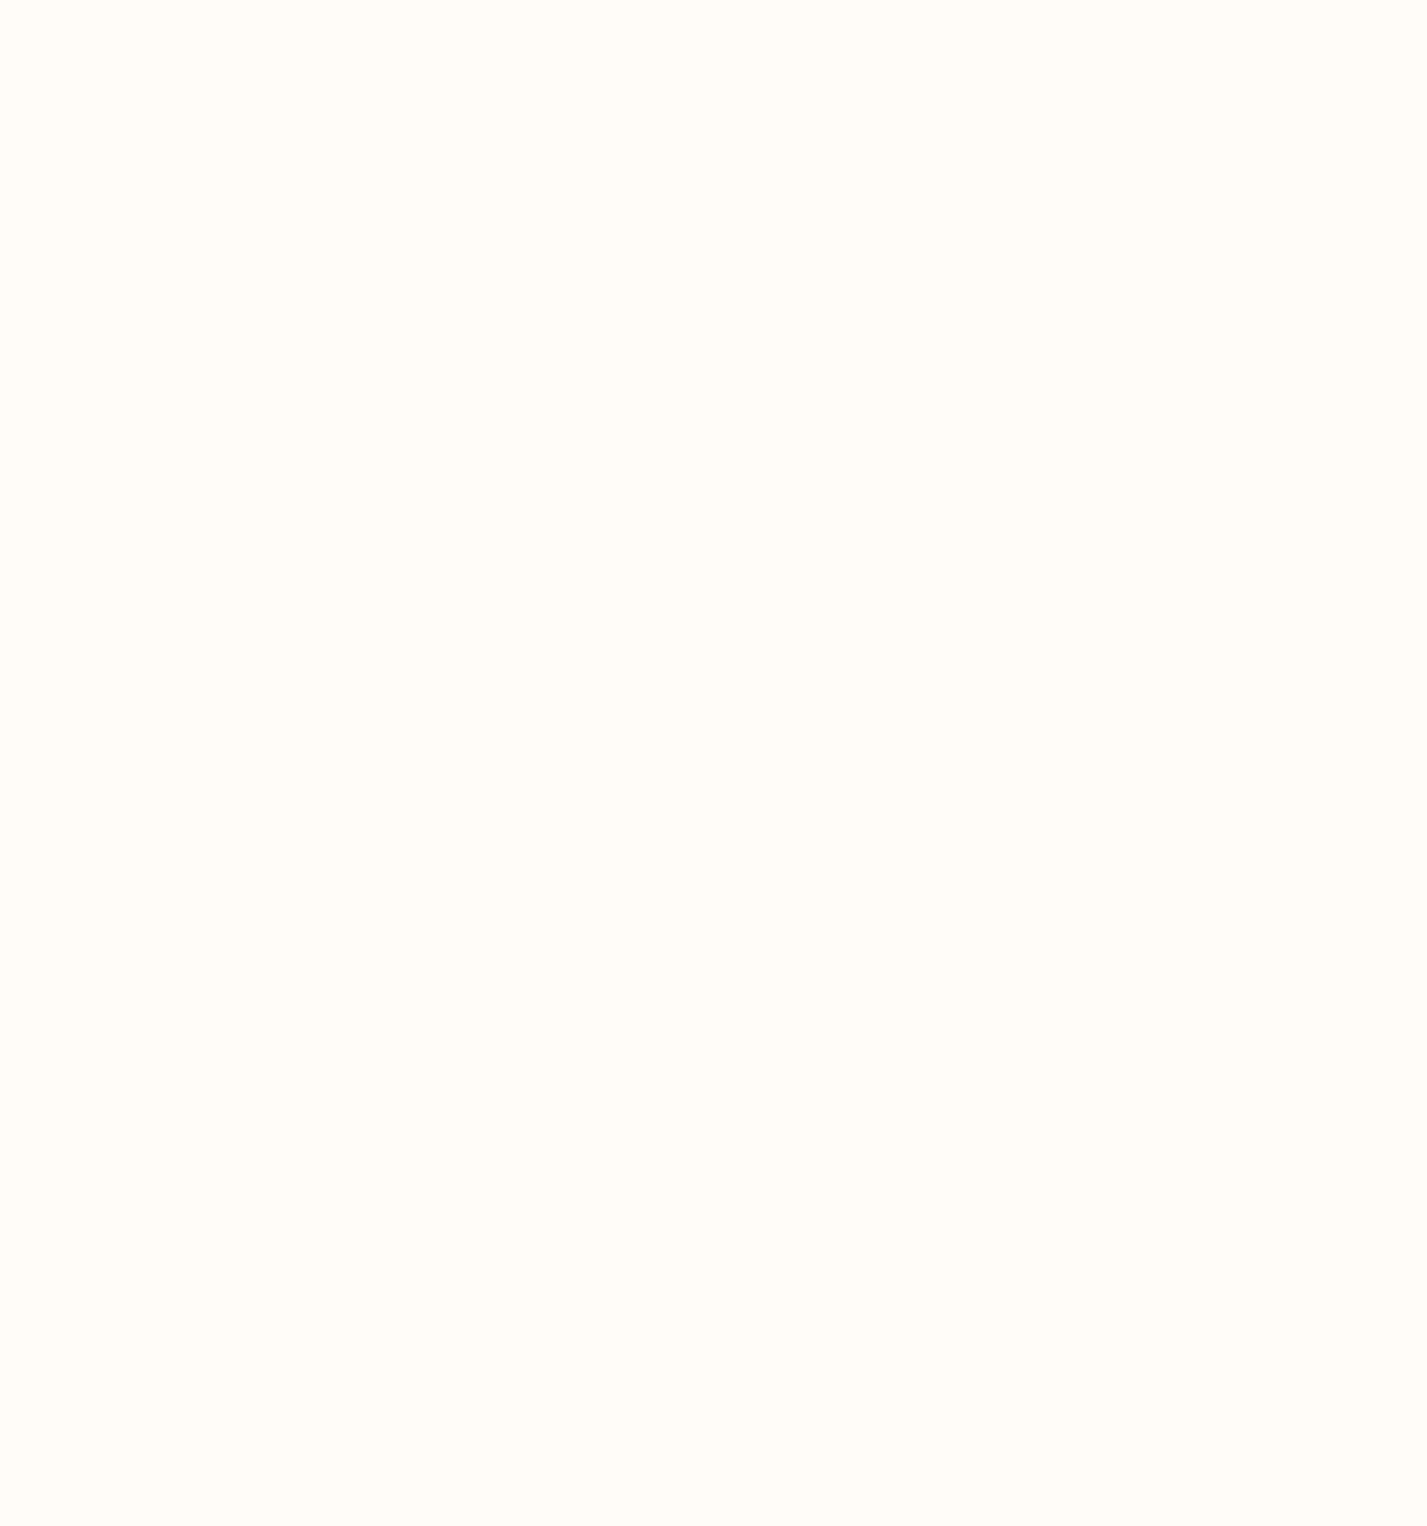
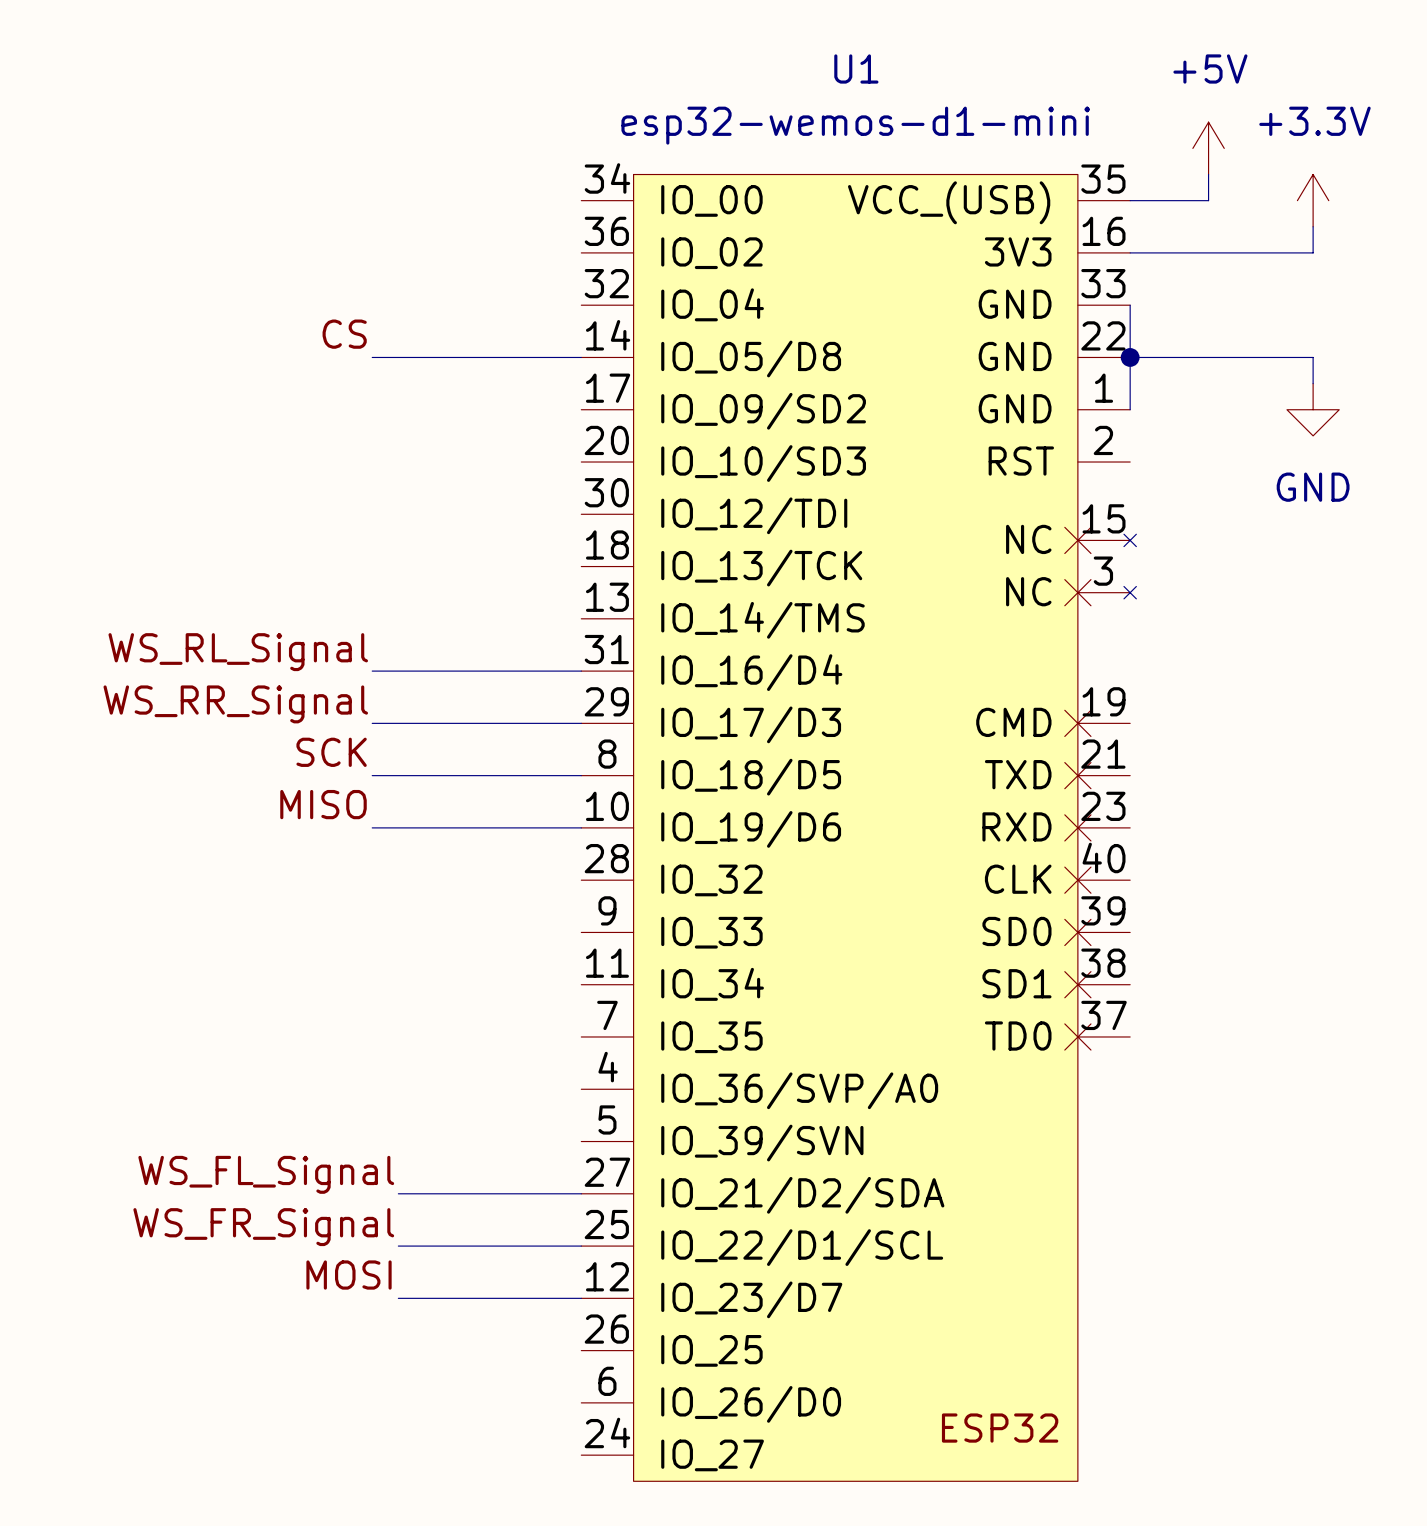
power symbol: none -> +5V (1208, 148)
wire: none -> (1208, 174) (1208, 200) (1130, 200)
power symbol: none -> +3.3V (1313, 200)
wire: none -> (1313, 226) (1313, 252) (1130, 252)
wire: none -> (1130, 305) (1130, 409)
label: none -> CS (344, 334)
wire: none -> (372, 357) (581, 357)
wire: none -> (1130, 357) (1313, 357) (1313, 383)
junction: none -> (1130, 357)
power symbol: none -> GND (1313, 409)
label: none -> WS_RL_Signal (238, 652)
wire: none -> (372, 671) (581, 671)
label: none -> WS_RR_Signal (235, 704)
wire: none -> (372, 723) (581, 723)
label: none -> SCK (331, 752)
wire: none -> (372, 775) (581, 775)
label: none -> MISO (323, 804)
wire: none -> (372, 827) (581, 827)
U1: none -> esp32-wemos-d1-mini (858, 827)
label: none -> WS_FL_Signal (266, 1174)
wire: none -> (398, 1193) (581, 1193)
label: none -> WS_FR_Signal (263, 1227)
wire: none -> (398, 1246) (581, 1246)
label: none -> MOSI (349, 1275)
wire: none -> (398, 1298) (581, 1298)

